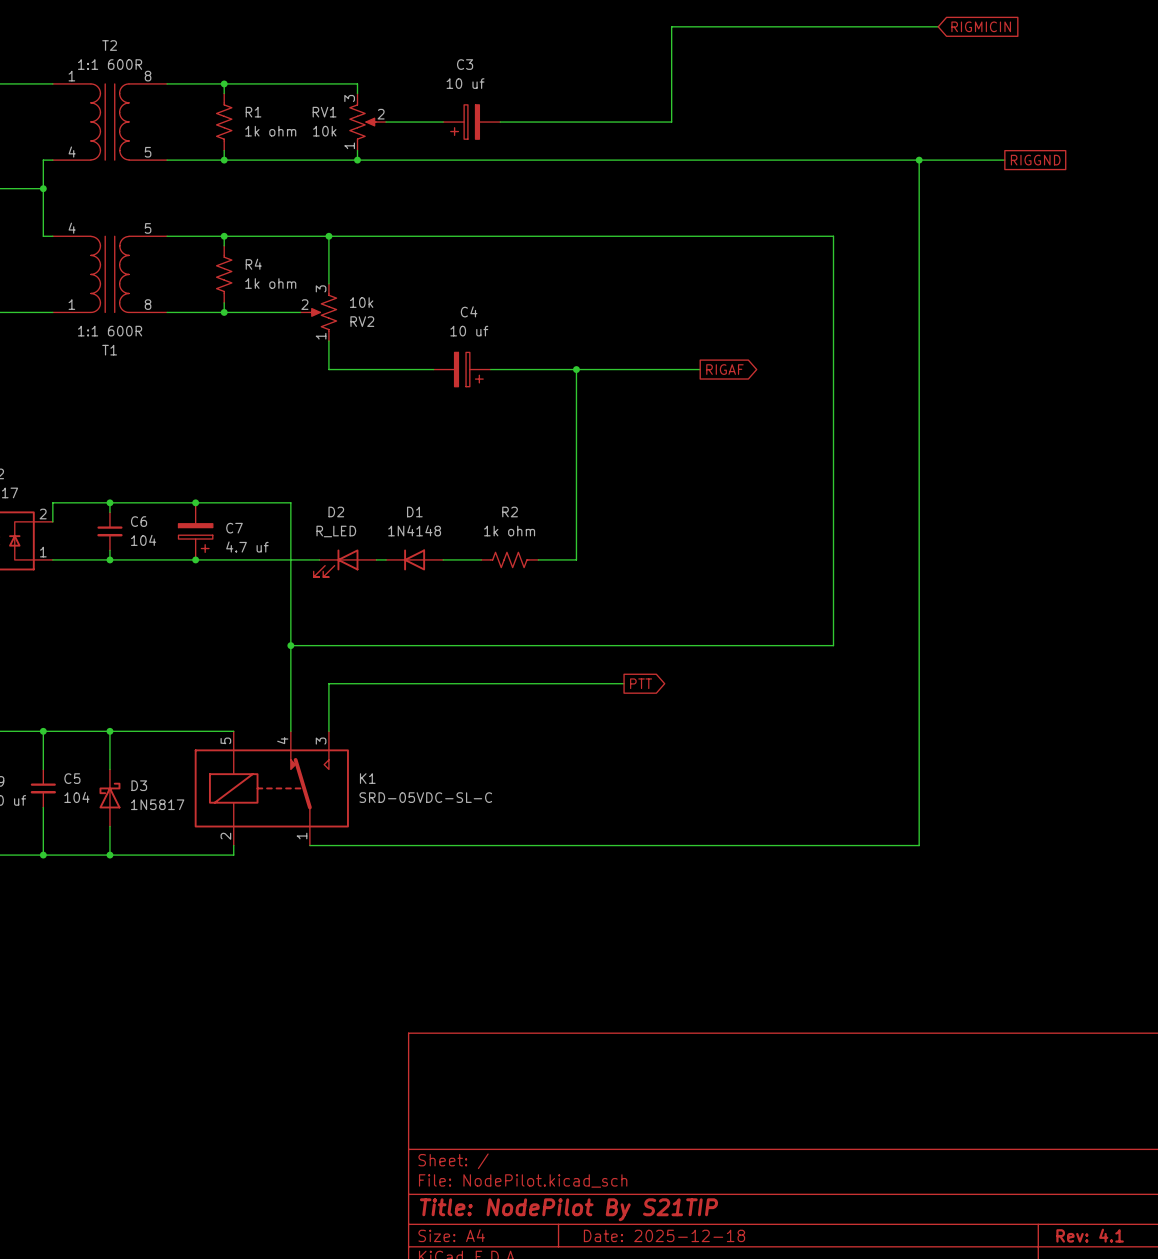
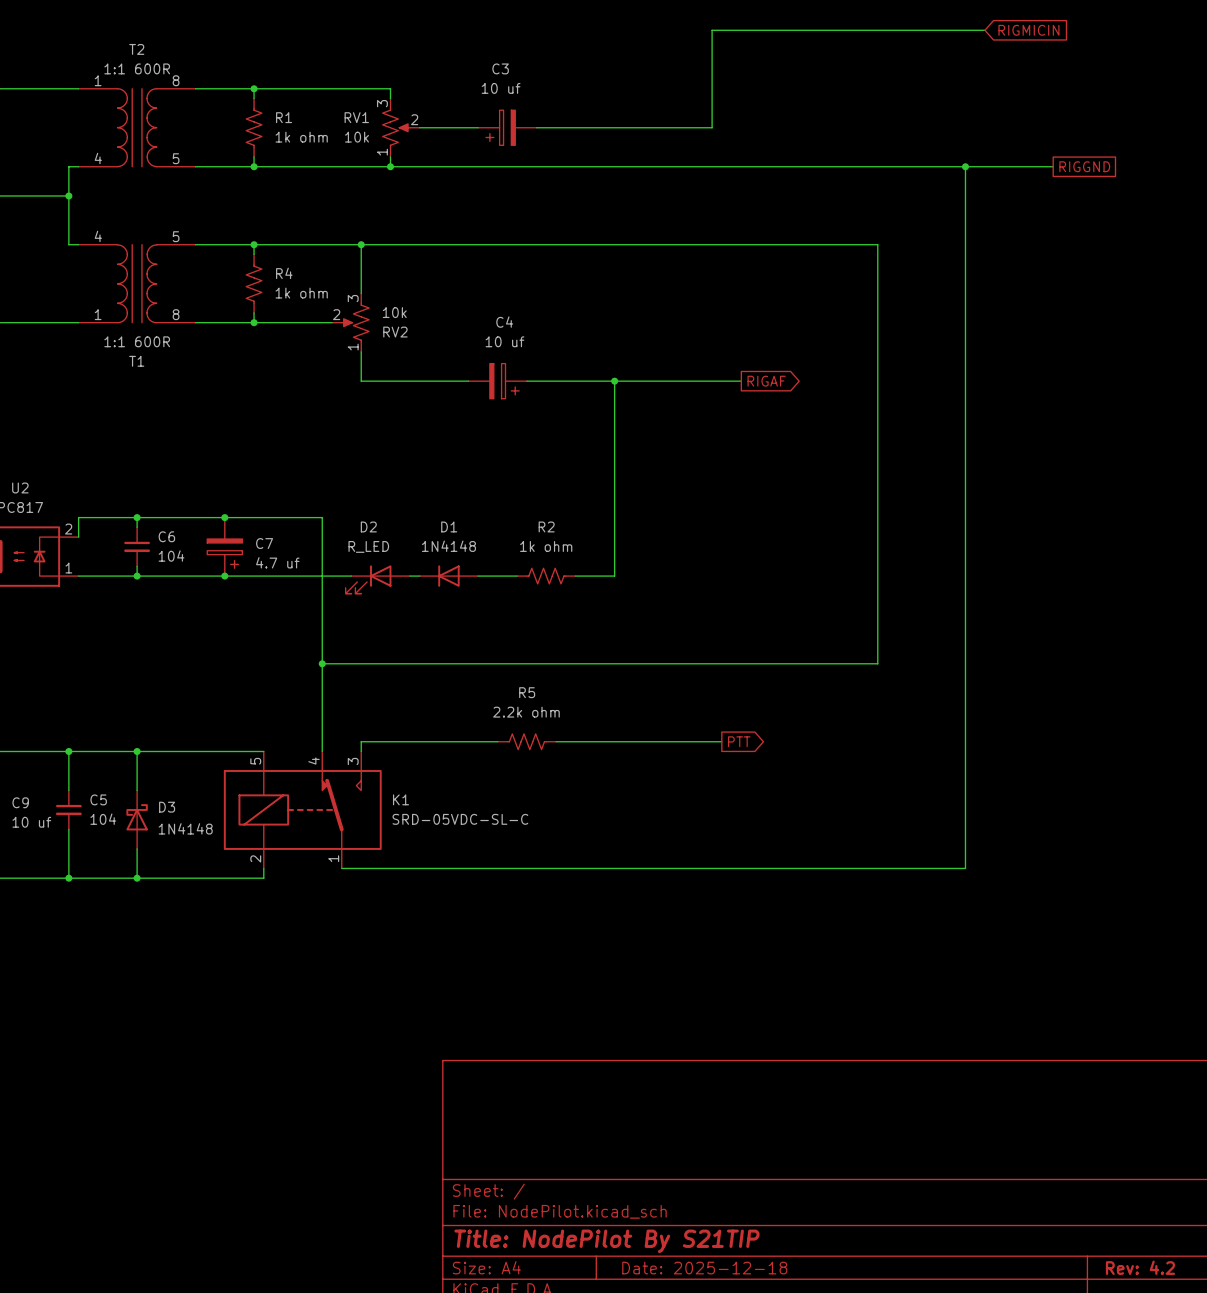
wire: (624, 683) (328, 683) (328, 721) -> (497, 741) (361, 741)
global label position: PTT (641, 683) -> PTT (739, 741)
R5: none -> 2.2k ohm (526, 741)
wire: none -> (556, 741) (721, 741)
D3 value: 1N5817 (157, 804) -> 1N4148 (185, 828)
title block: Rev: 4.1 (1090, 1235) -> Rev: 4.2 (1140, 1267)

